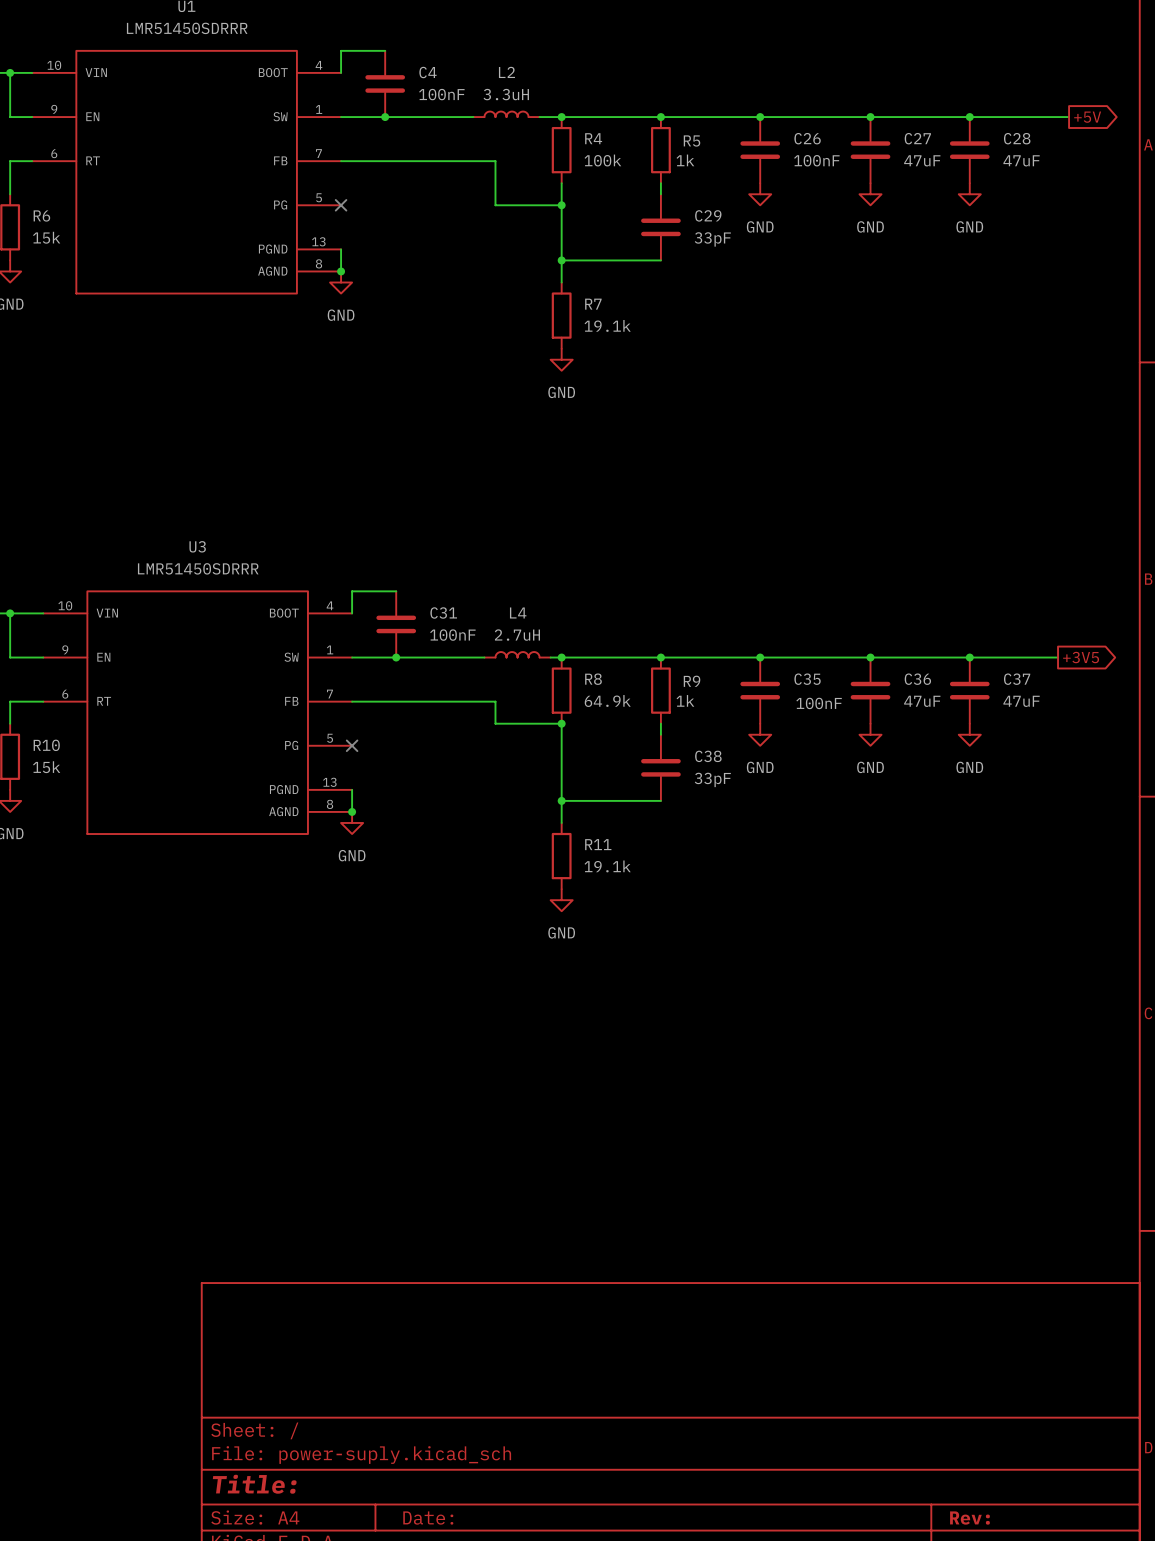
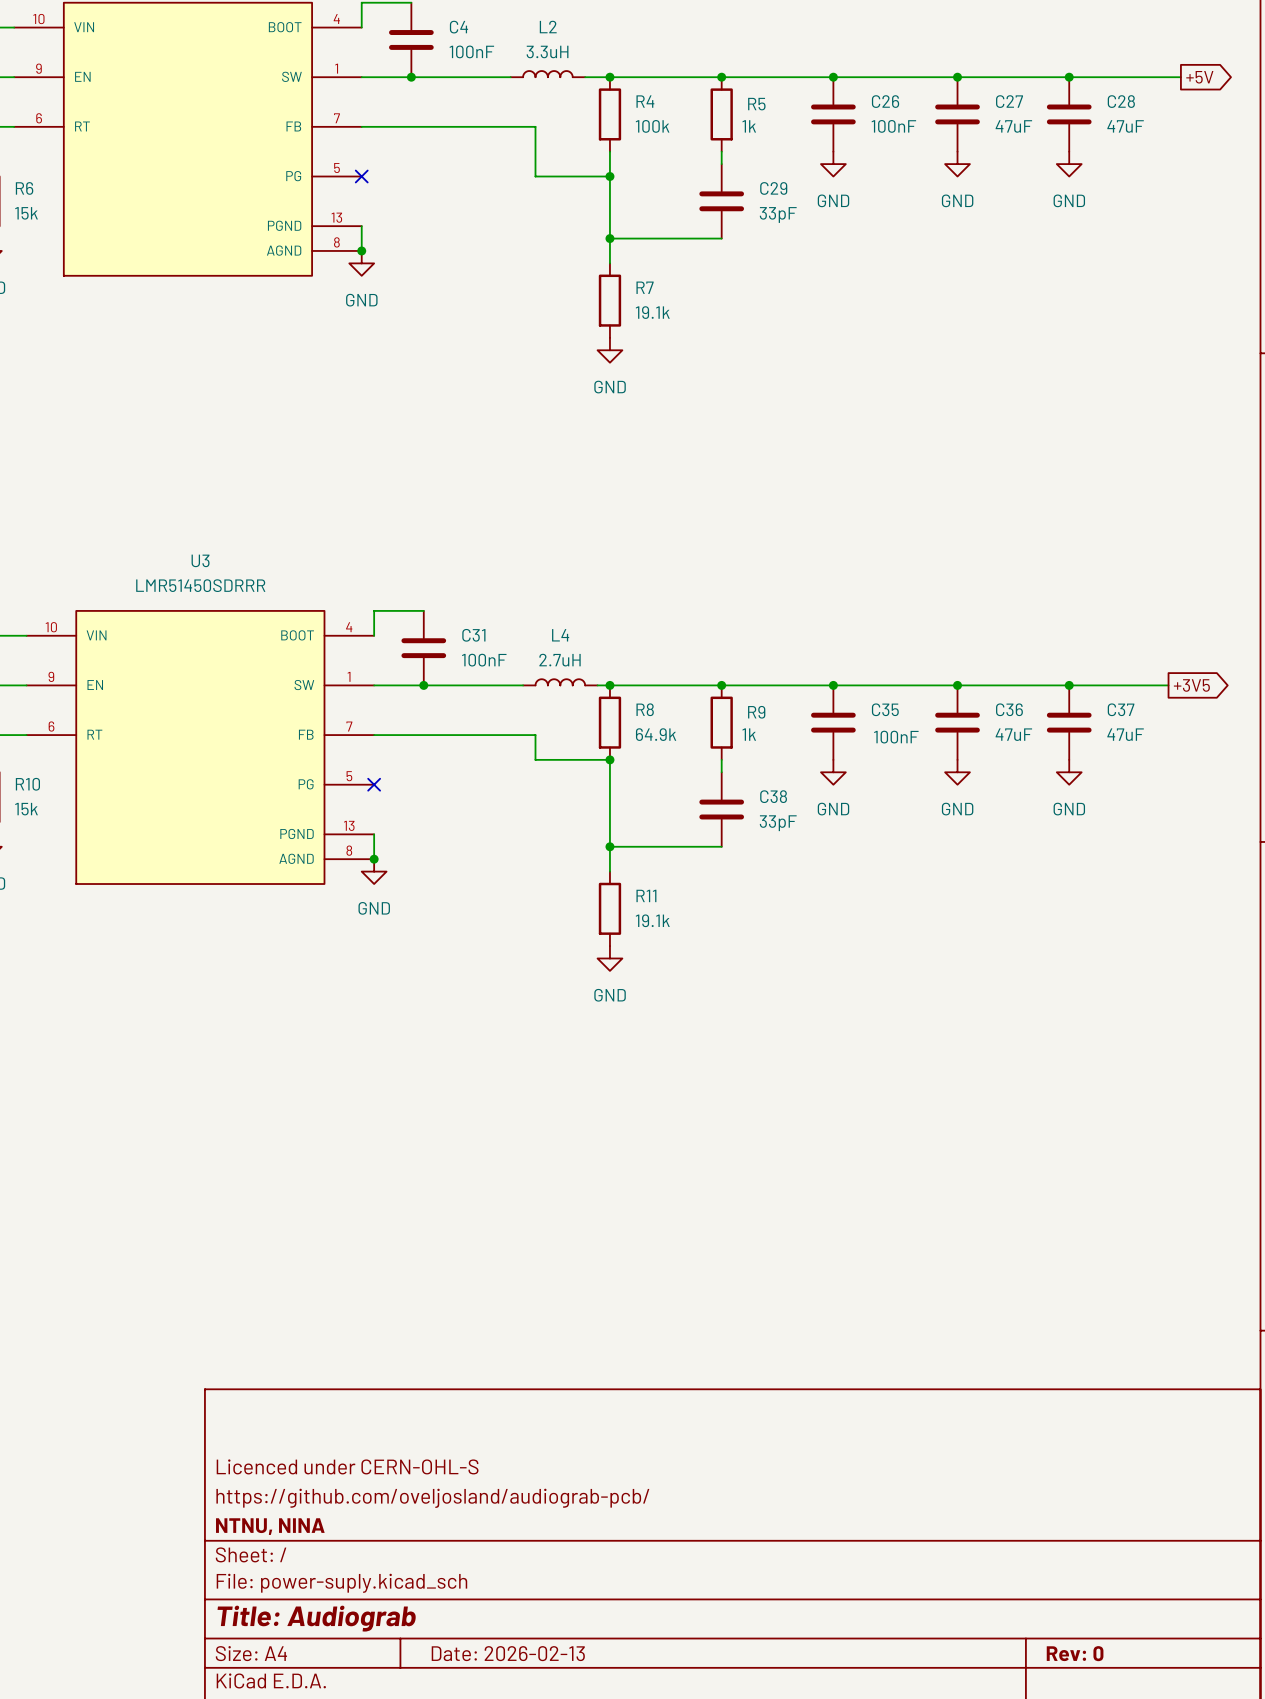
title block: none -> Licenced under CERN-OHL-S (347, 1466)
title block: none -> https://github.com/oveljosland/audiograb-pcb/ (432, 1498)
title block: none -> NTNU, NINA (270, 1526)
title block: Title: (254, 1484) -> Title: Audiograb (316, 1618)
title block: Date: (428, 1518) -> Date: 2026-02-13 (508, 1653)
title block: Rev: (969, 1518) -> Rev: 0 (1075, 1653)

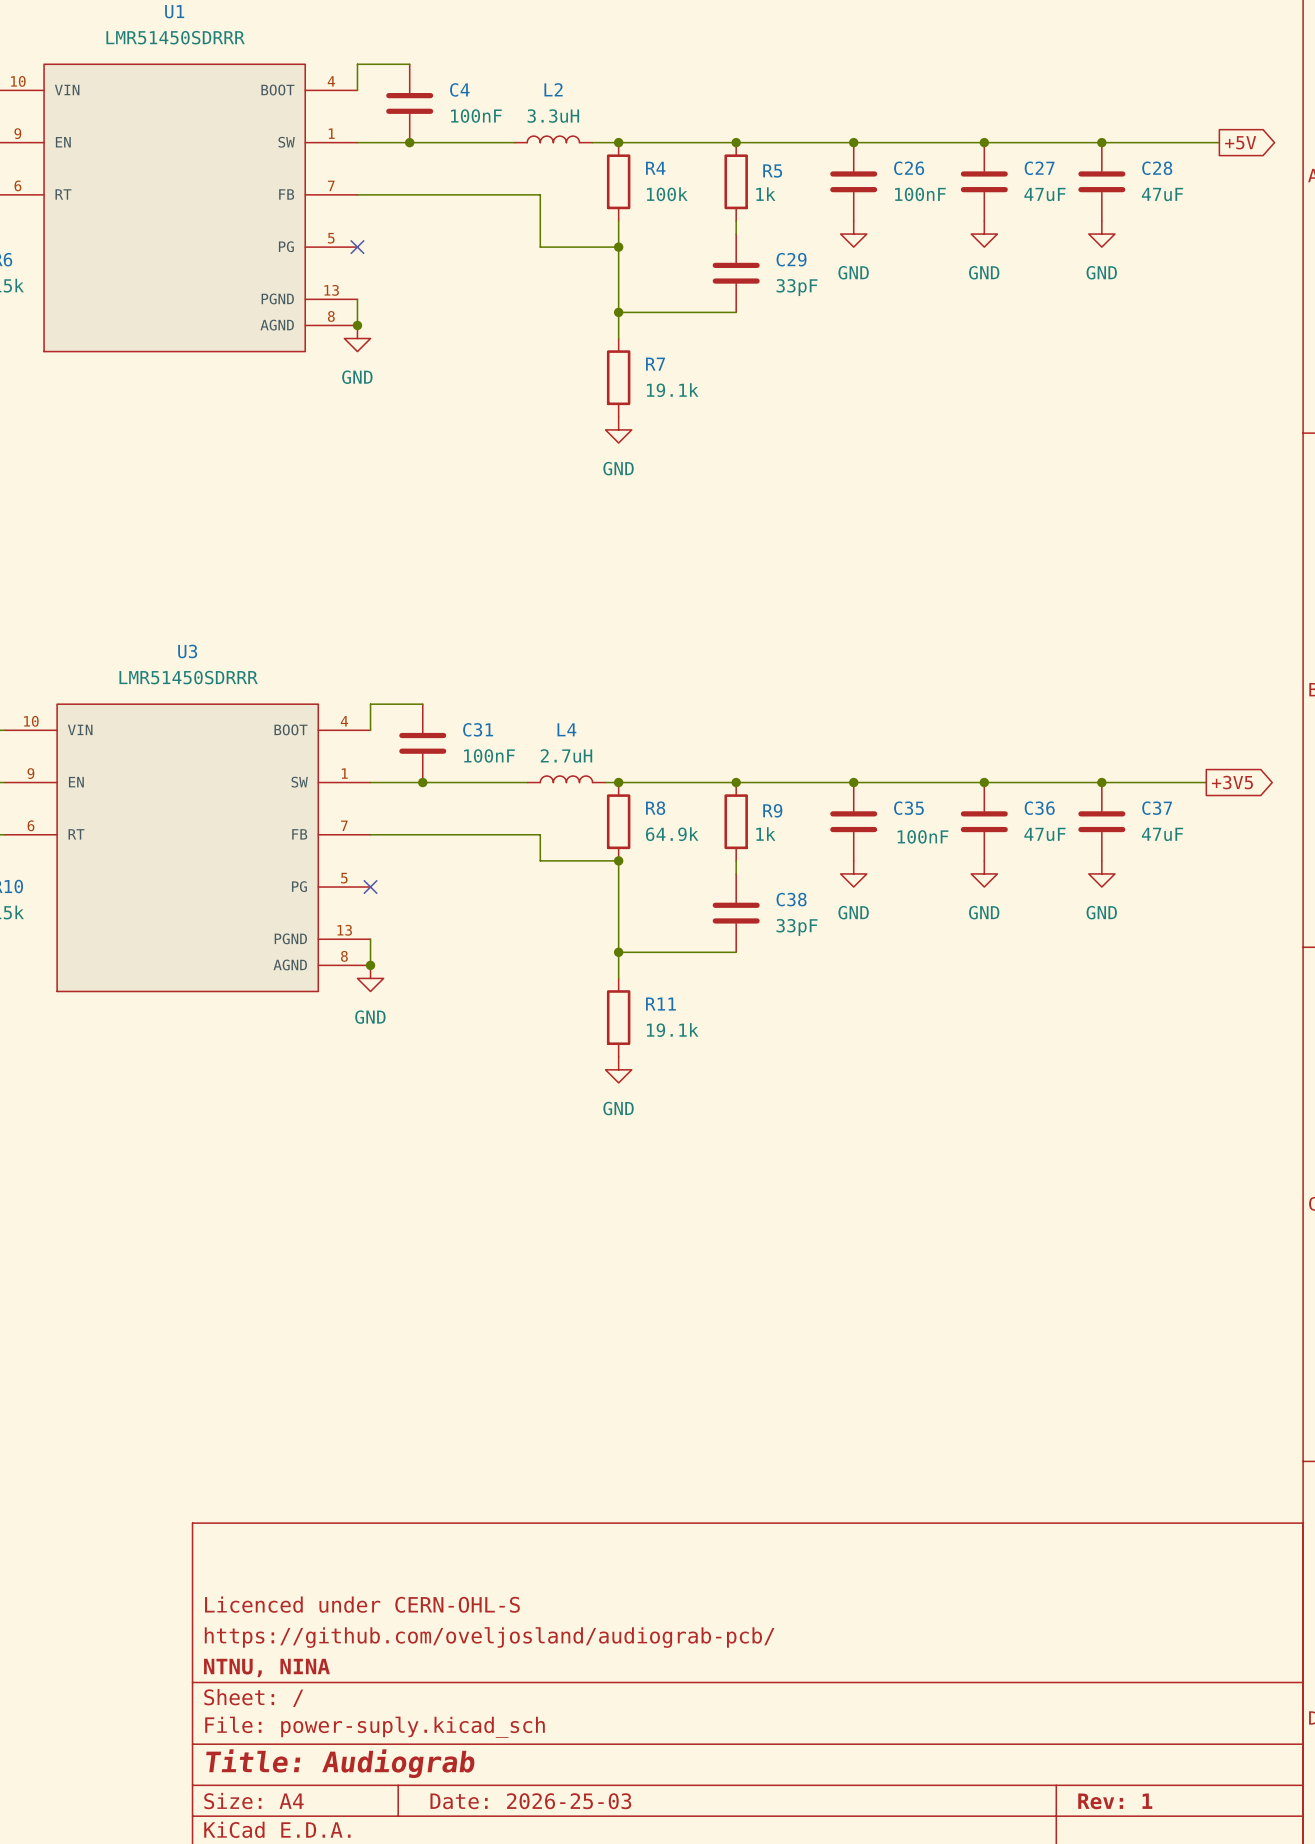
title block: Date: 2026-02-13 (508, 1653) -> Date: 2026-25-03 (530, 1801)
title block: Rev: 0 (1075, 1653) -> Rev: 1 (1115, 1801)

